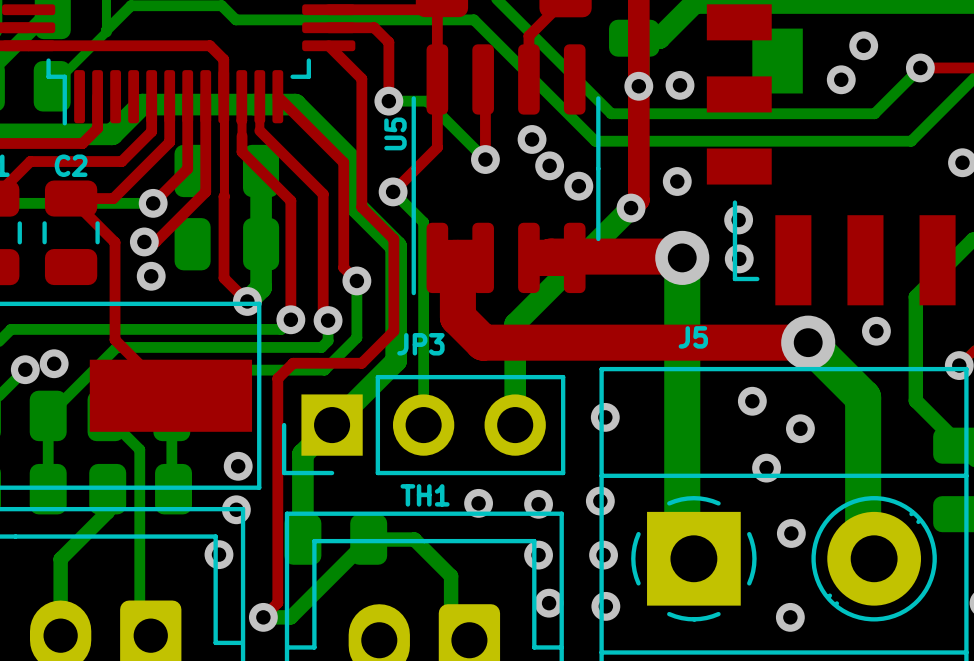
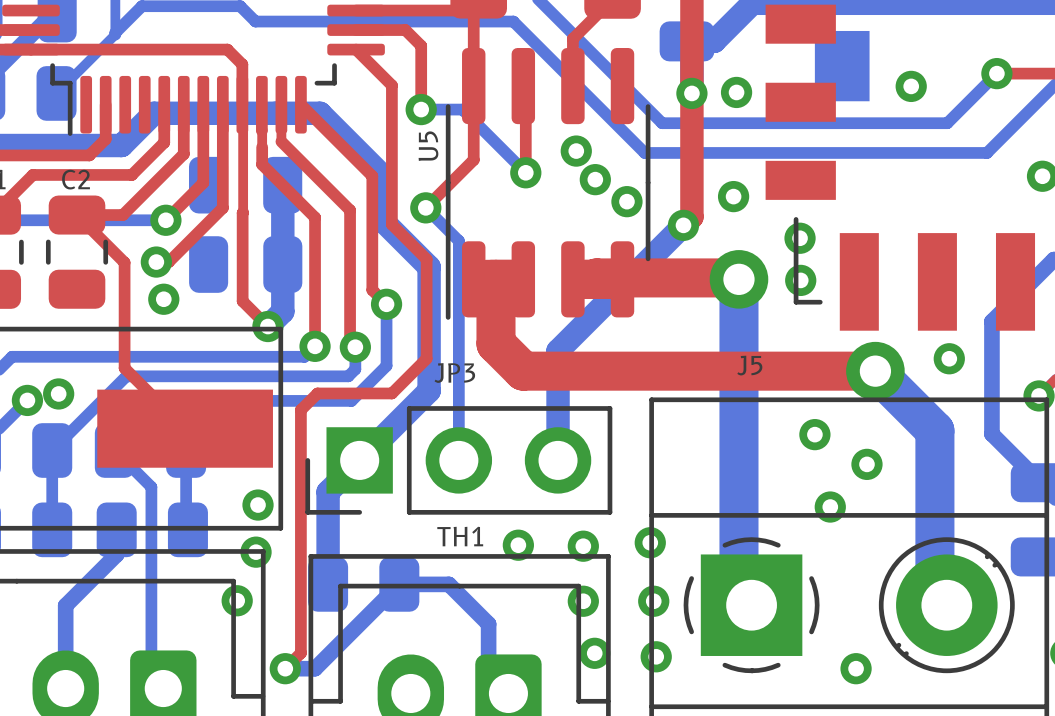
via: (863, 45) -> none
via: (605, 417) -> none
via: (791, 533) -> none

